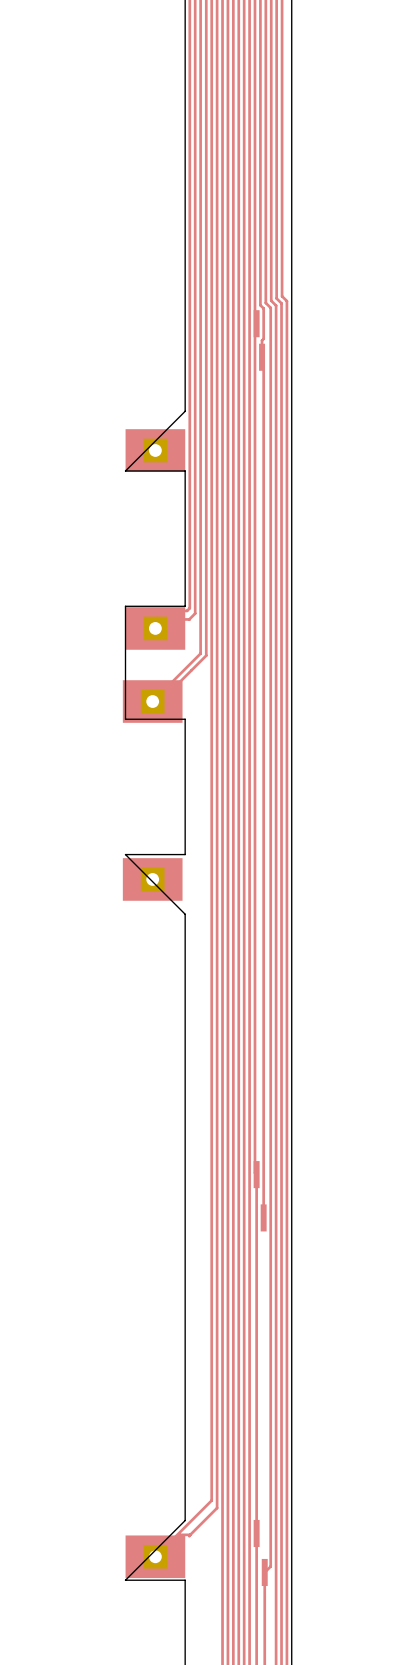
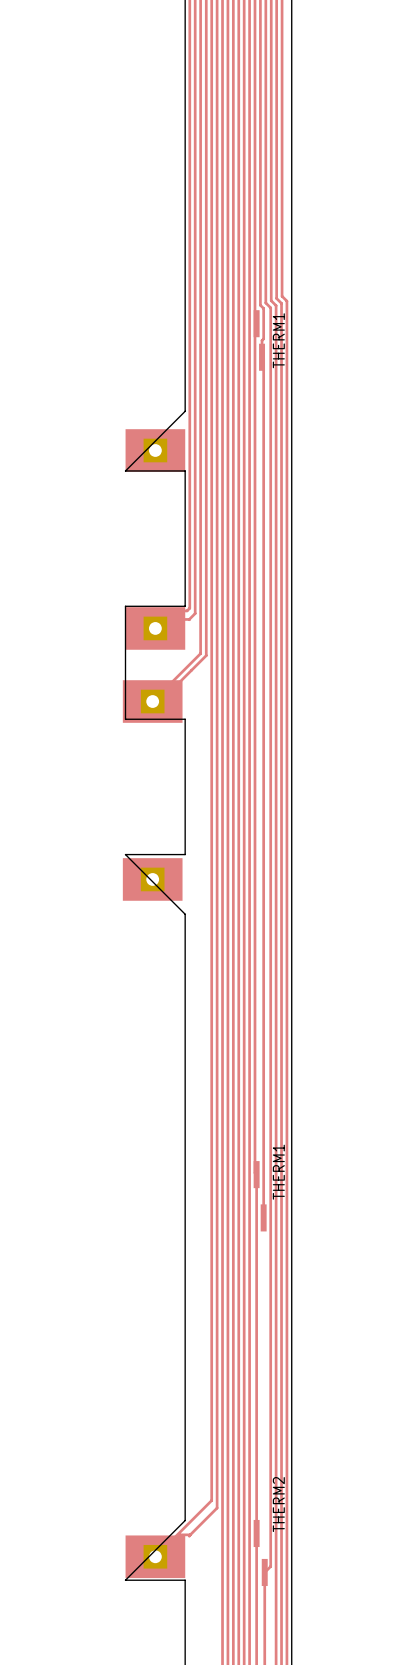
text: none -> THERM1 (278, 340)
text: none -> THERM1 (278, 1172)
text: none -> THERM2 (278, 1504)

